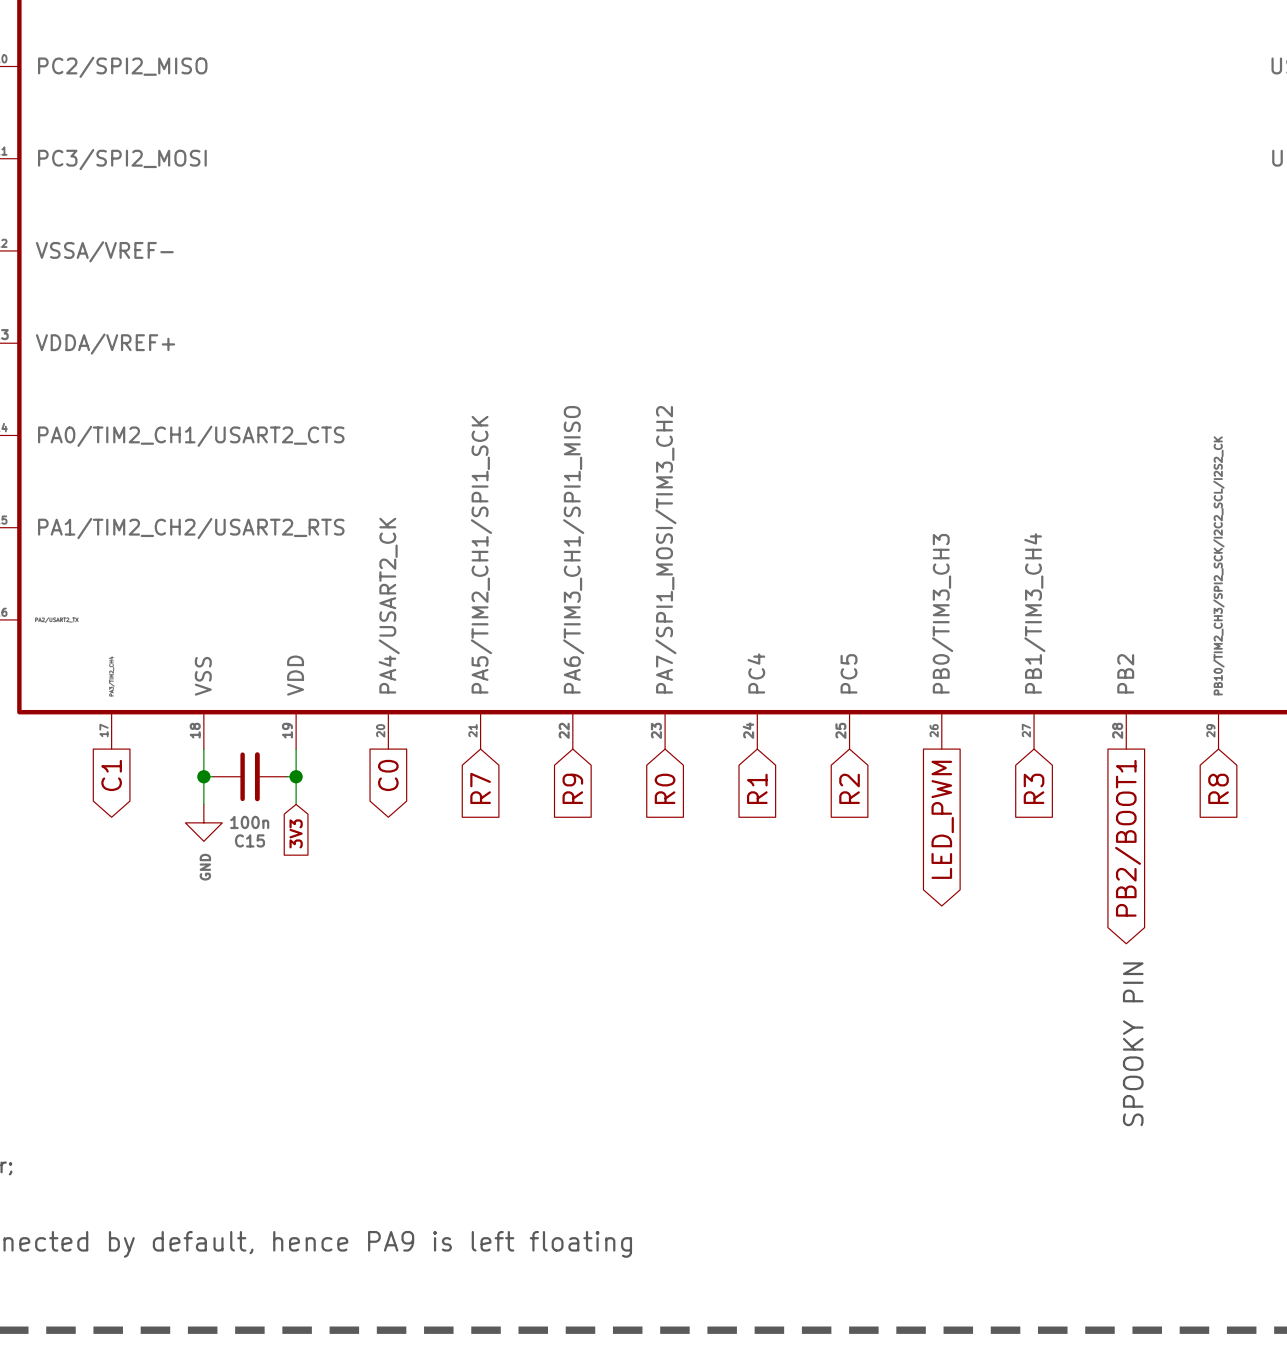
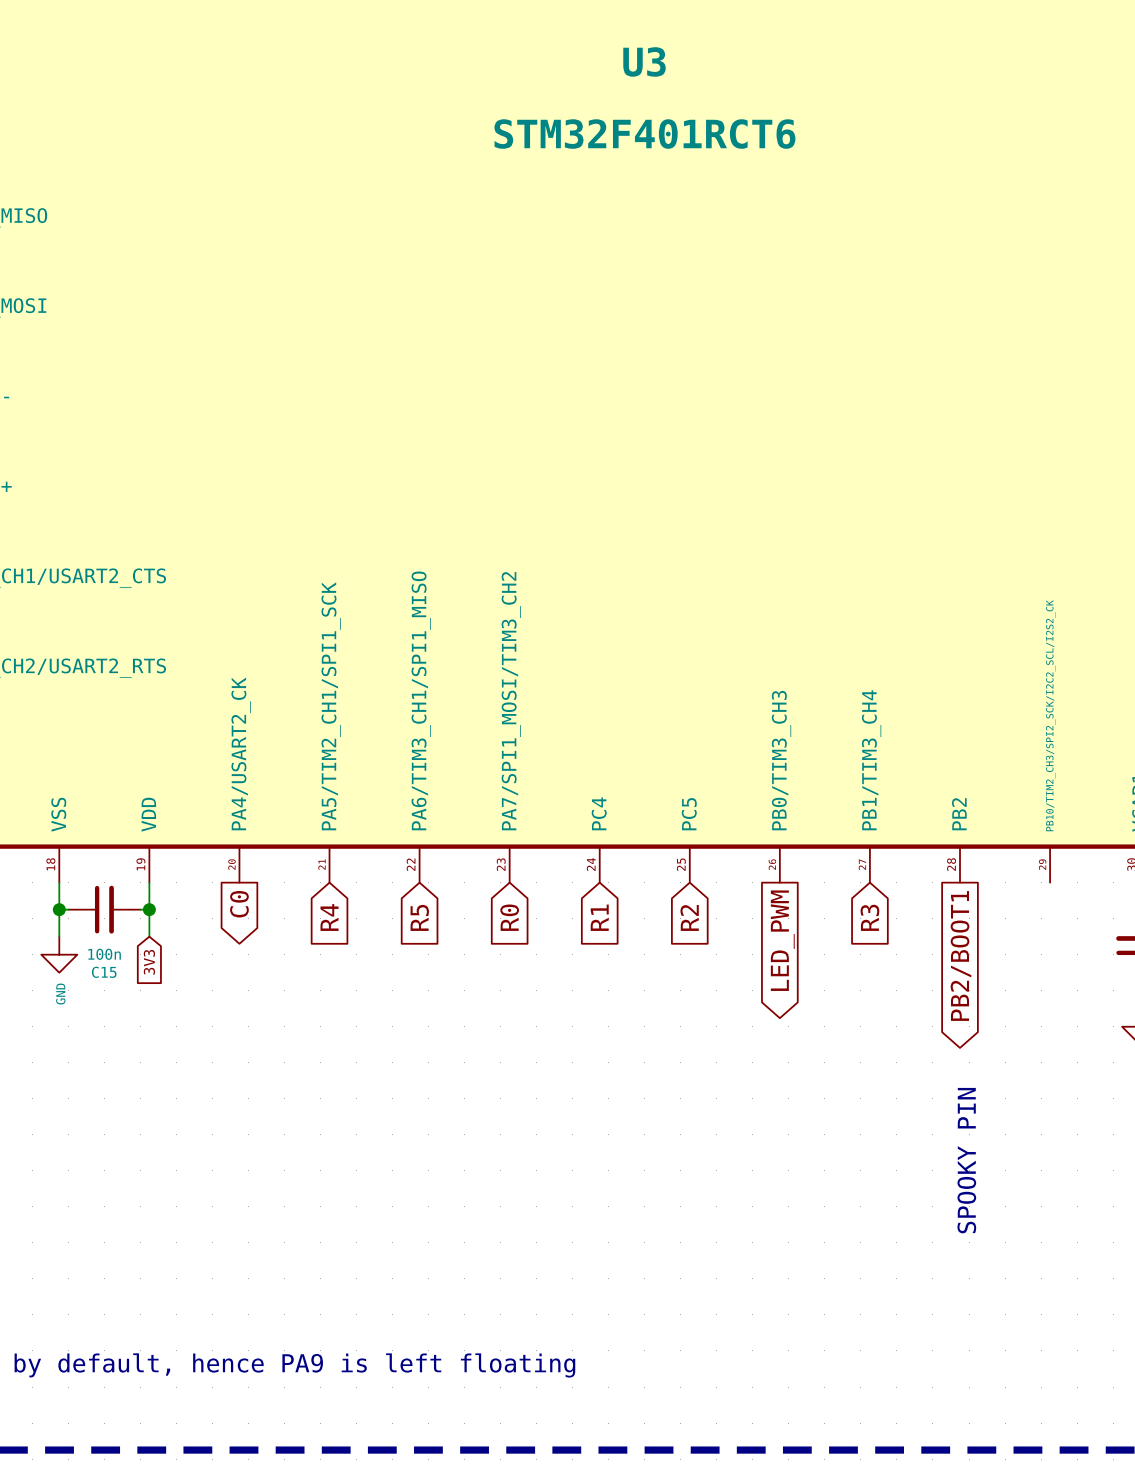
global label: R7 (480, 788) -> R4 (329, 917)
global label: R9 (572, 788) -> R5 (419, 917)
global label: R8 (1218, 788) -> none

